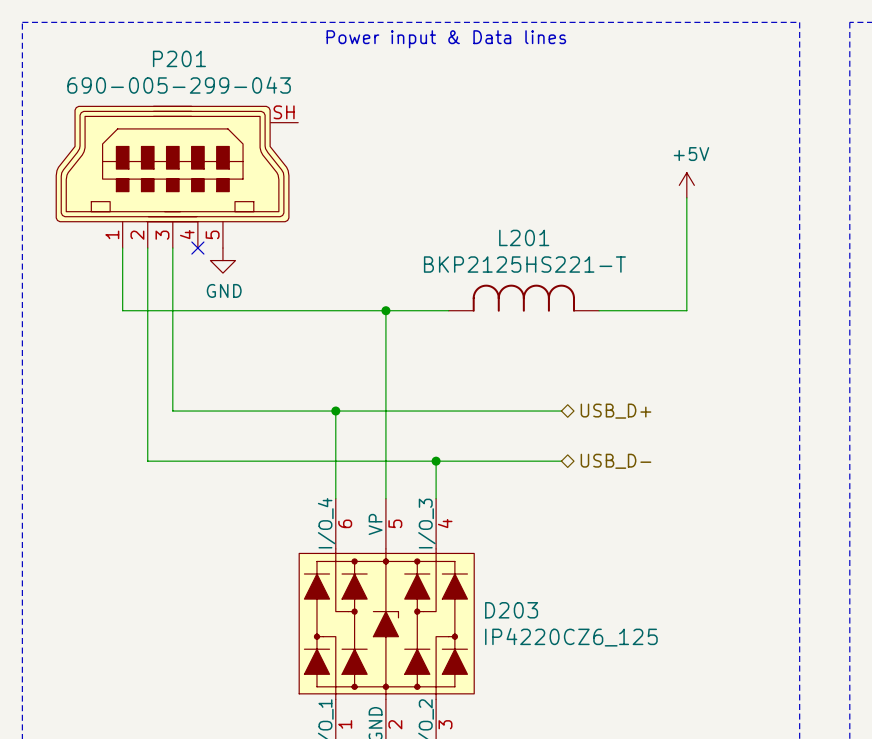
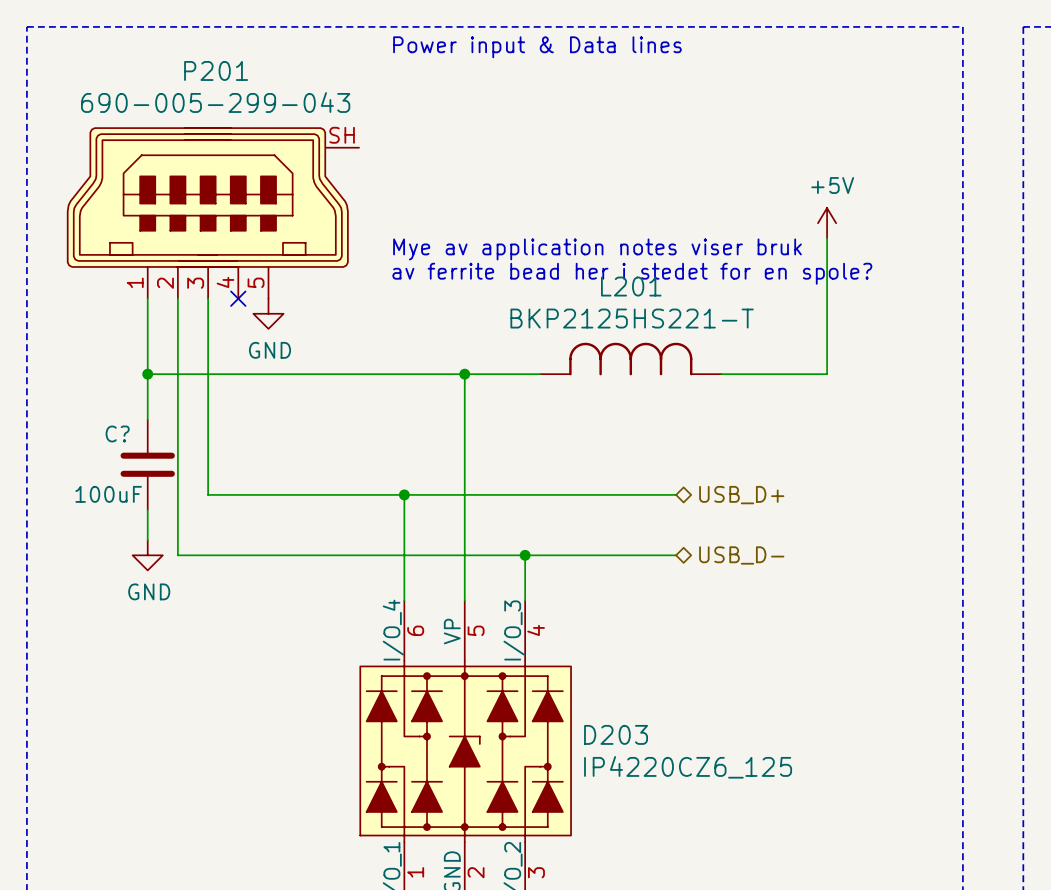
text: none -> Mye av application notes viser bruk (597, 249)
text: none -> av ferrite bead her i stedet for en spole? (632, 273)
wire: none -> (147, 374) (147, 419)
junction: none -> (147, 374)
C?: none -> 100uF (147, 464)
wire: none -> (147, 510) (147, 540)
power symbol: none -> GND (147, 555)

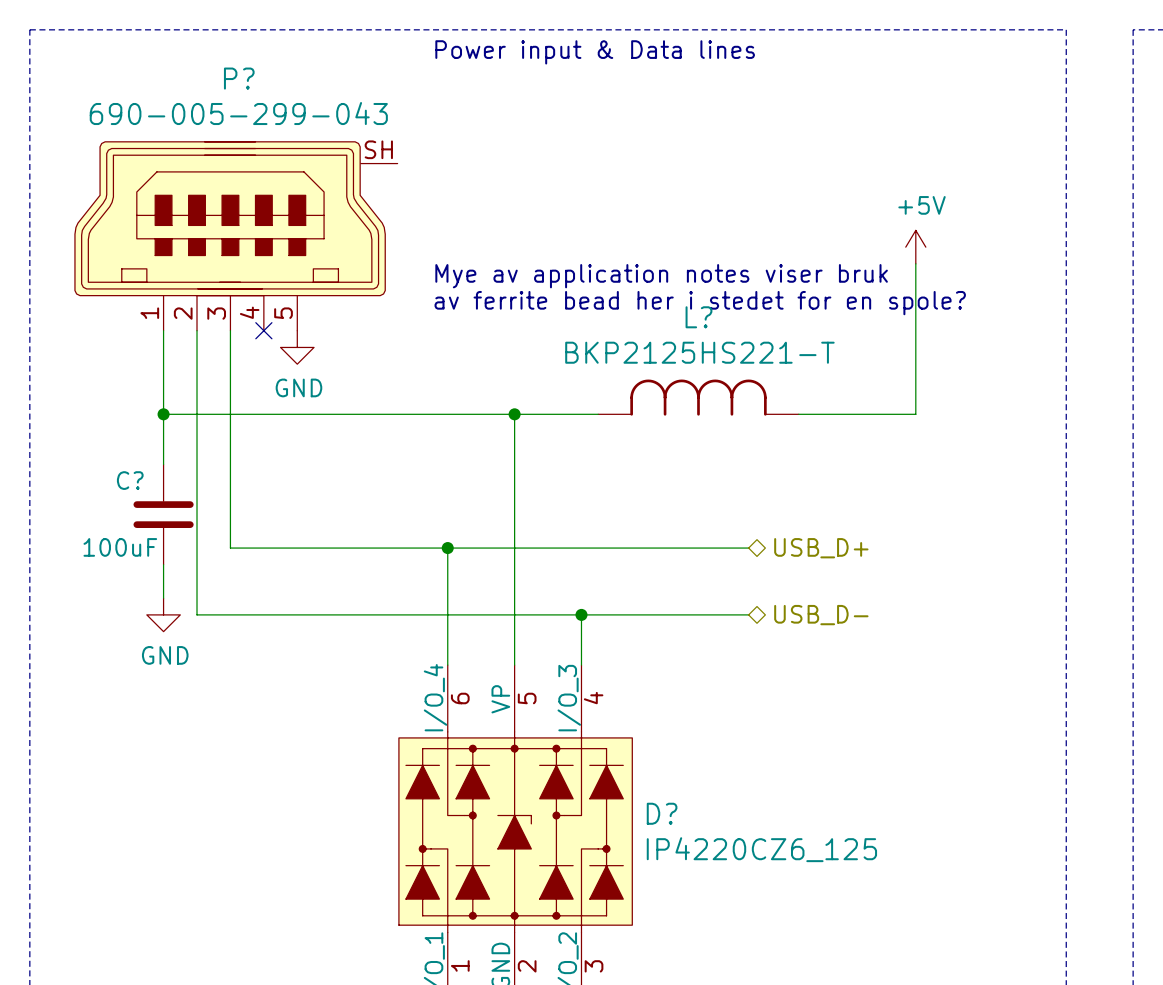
P201 name: P201 (216, 70) -> P? (239, 78)
L201 name: L201 (631, 286) -> L? (698, 317)
D203 name: D203 (616, 734) -> D? (662, 813)

